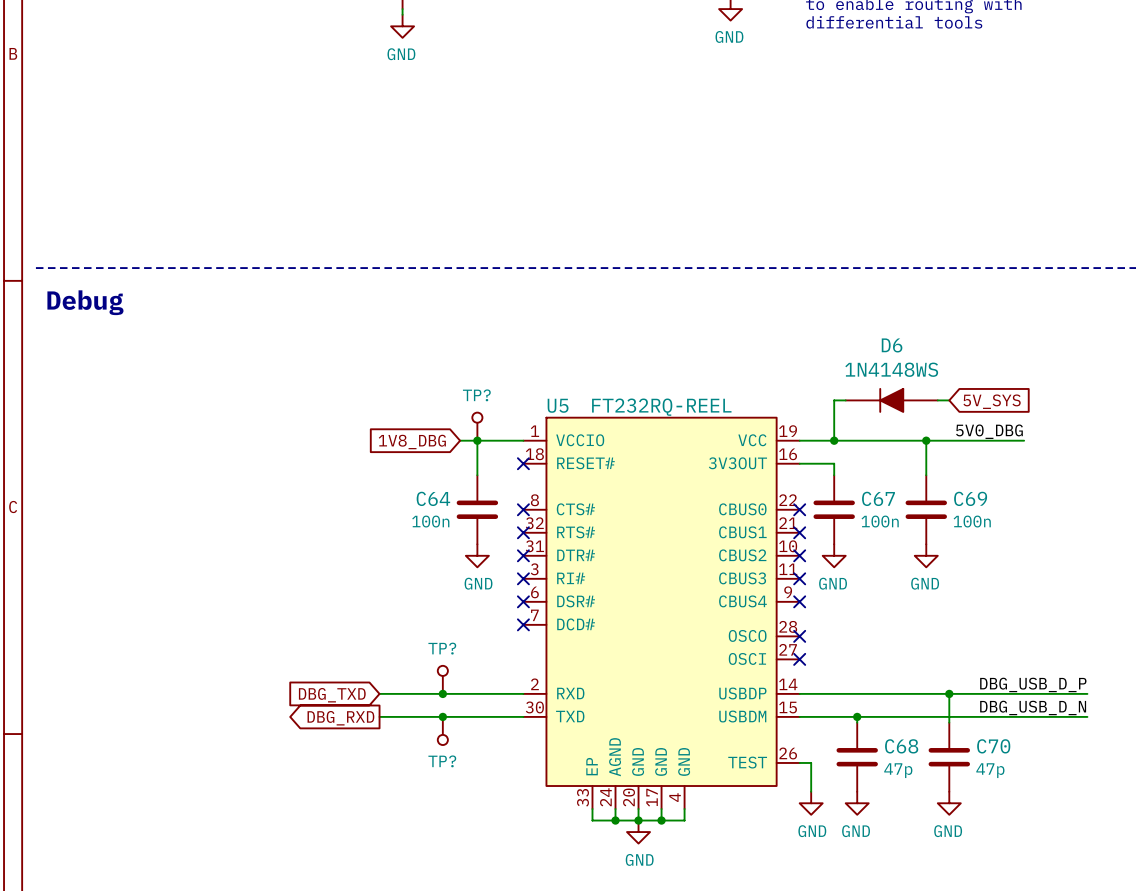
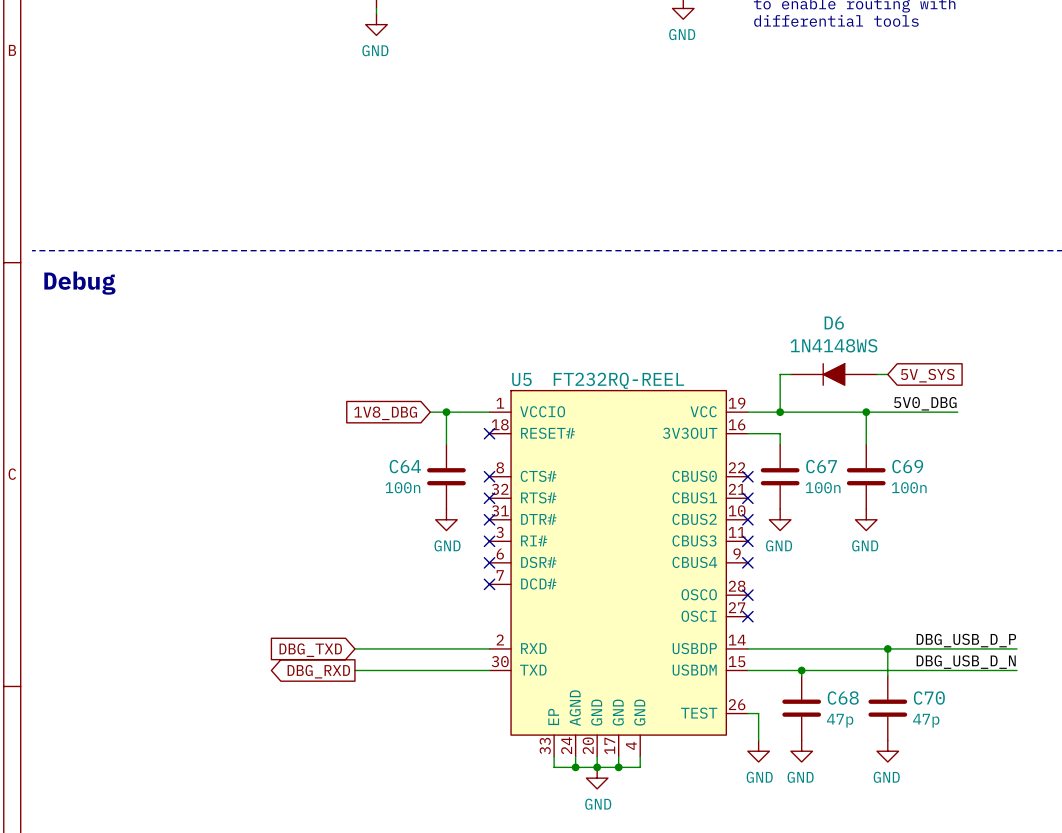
TP?: (477, 426) -> none
TP?: (442, 679) -> none
junction: (442, 693) -> none
junction: (442, 716) -> none
TP?: (442, 730) -> none

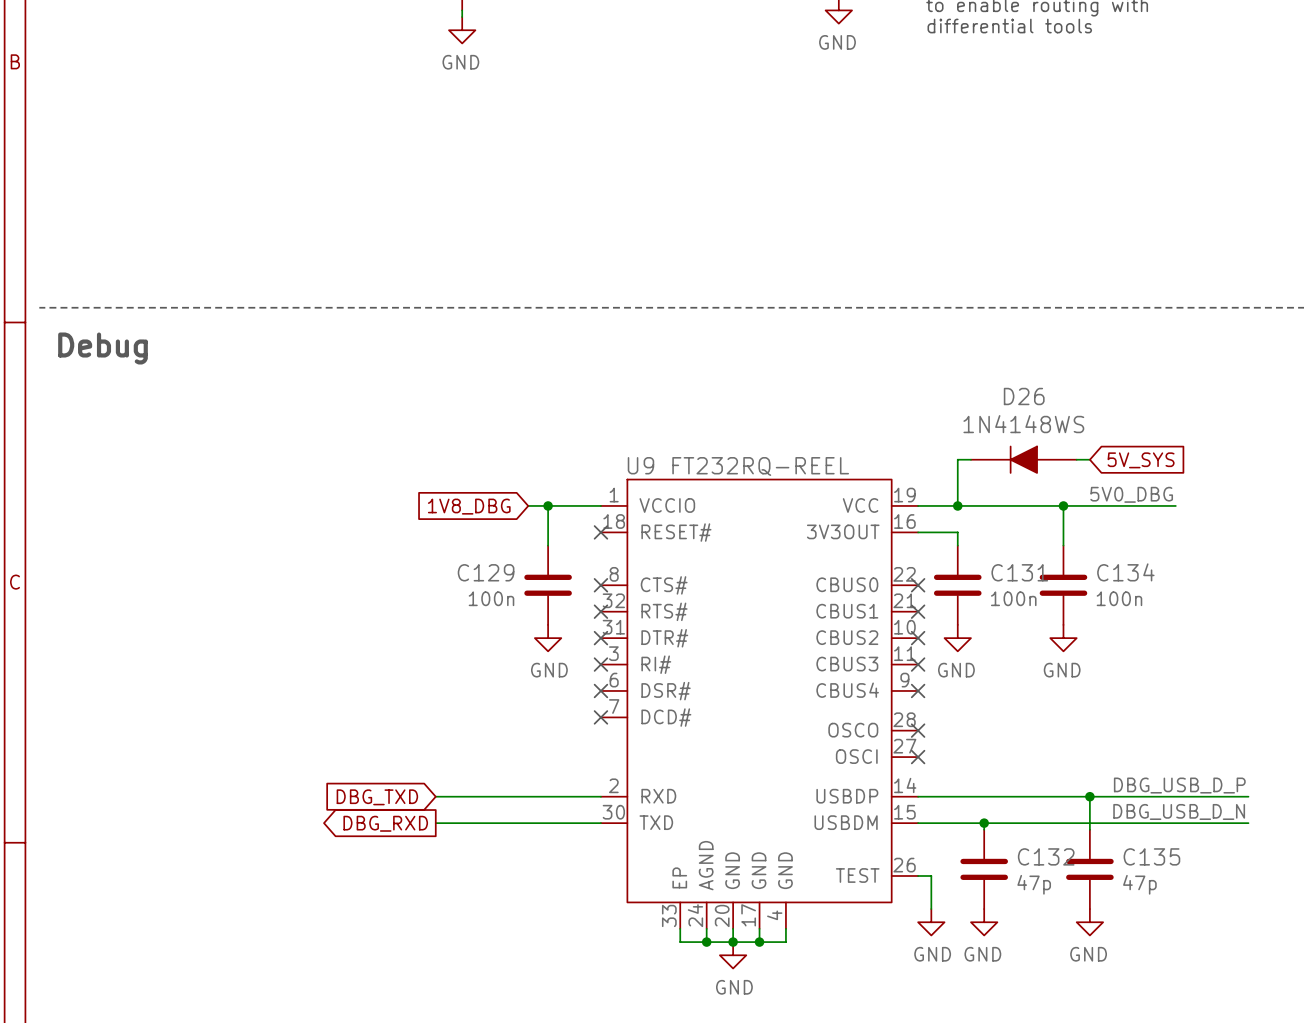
D6 name: D6 (834, 323) -> D26 (1024, 396)
U5 name: U5 (521, 379) -> U9 (640, 465)
C64 name: C64 (405, 466) -> C129 (486, 572)
C67 name: C67 (821, 466) -> C131 (1019, 572)
C69 name: C69 (907, 466) -> C134 (1125, 572)
C68 name: C68 (843, 698) -> C132 (1046, 856)
C70 name: C70 (929, 698) -> C135 (1151, 856)

